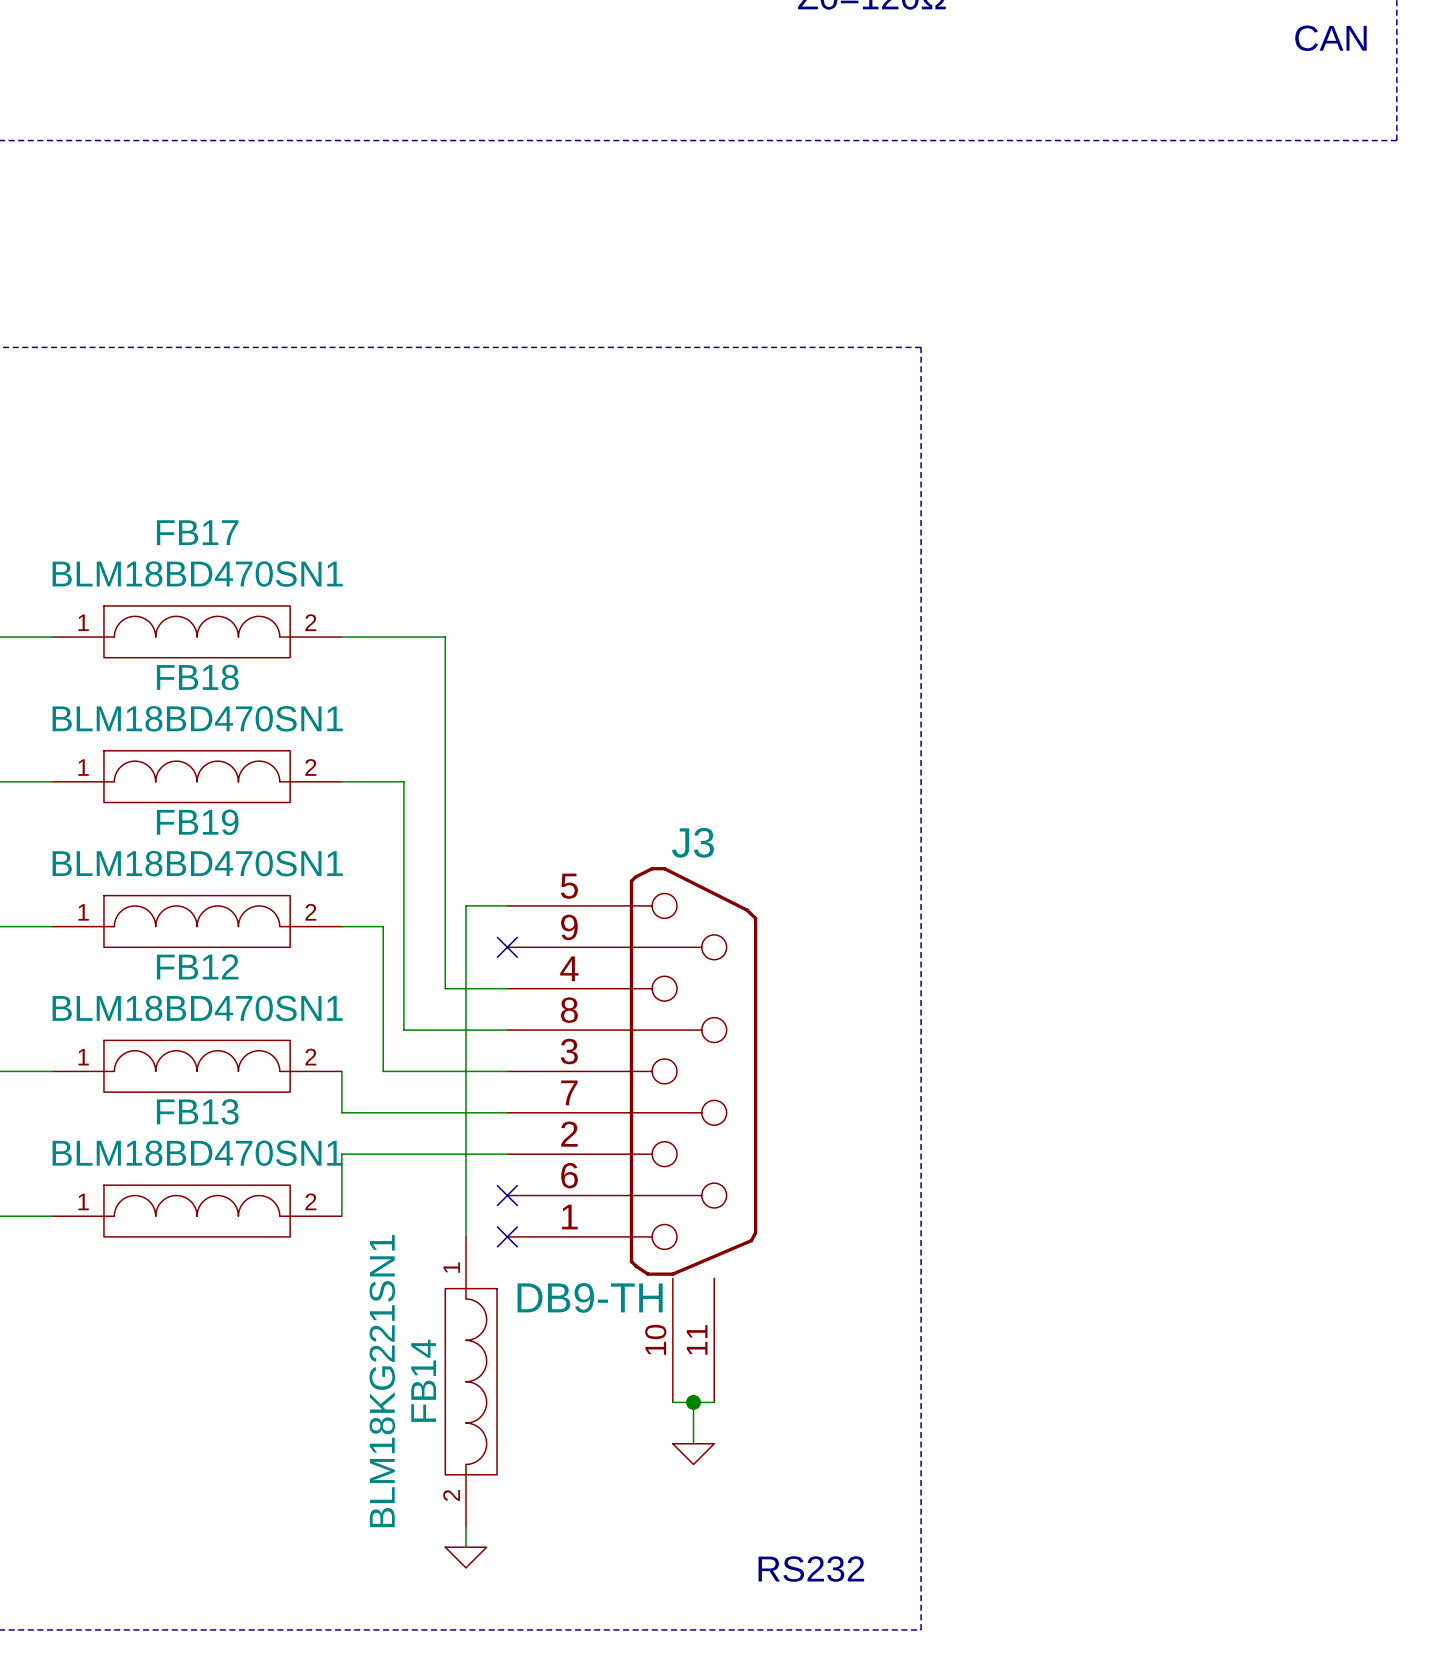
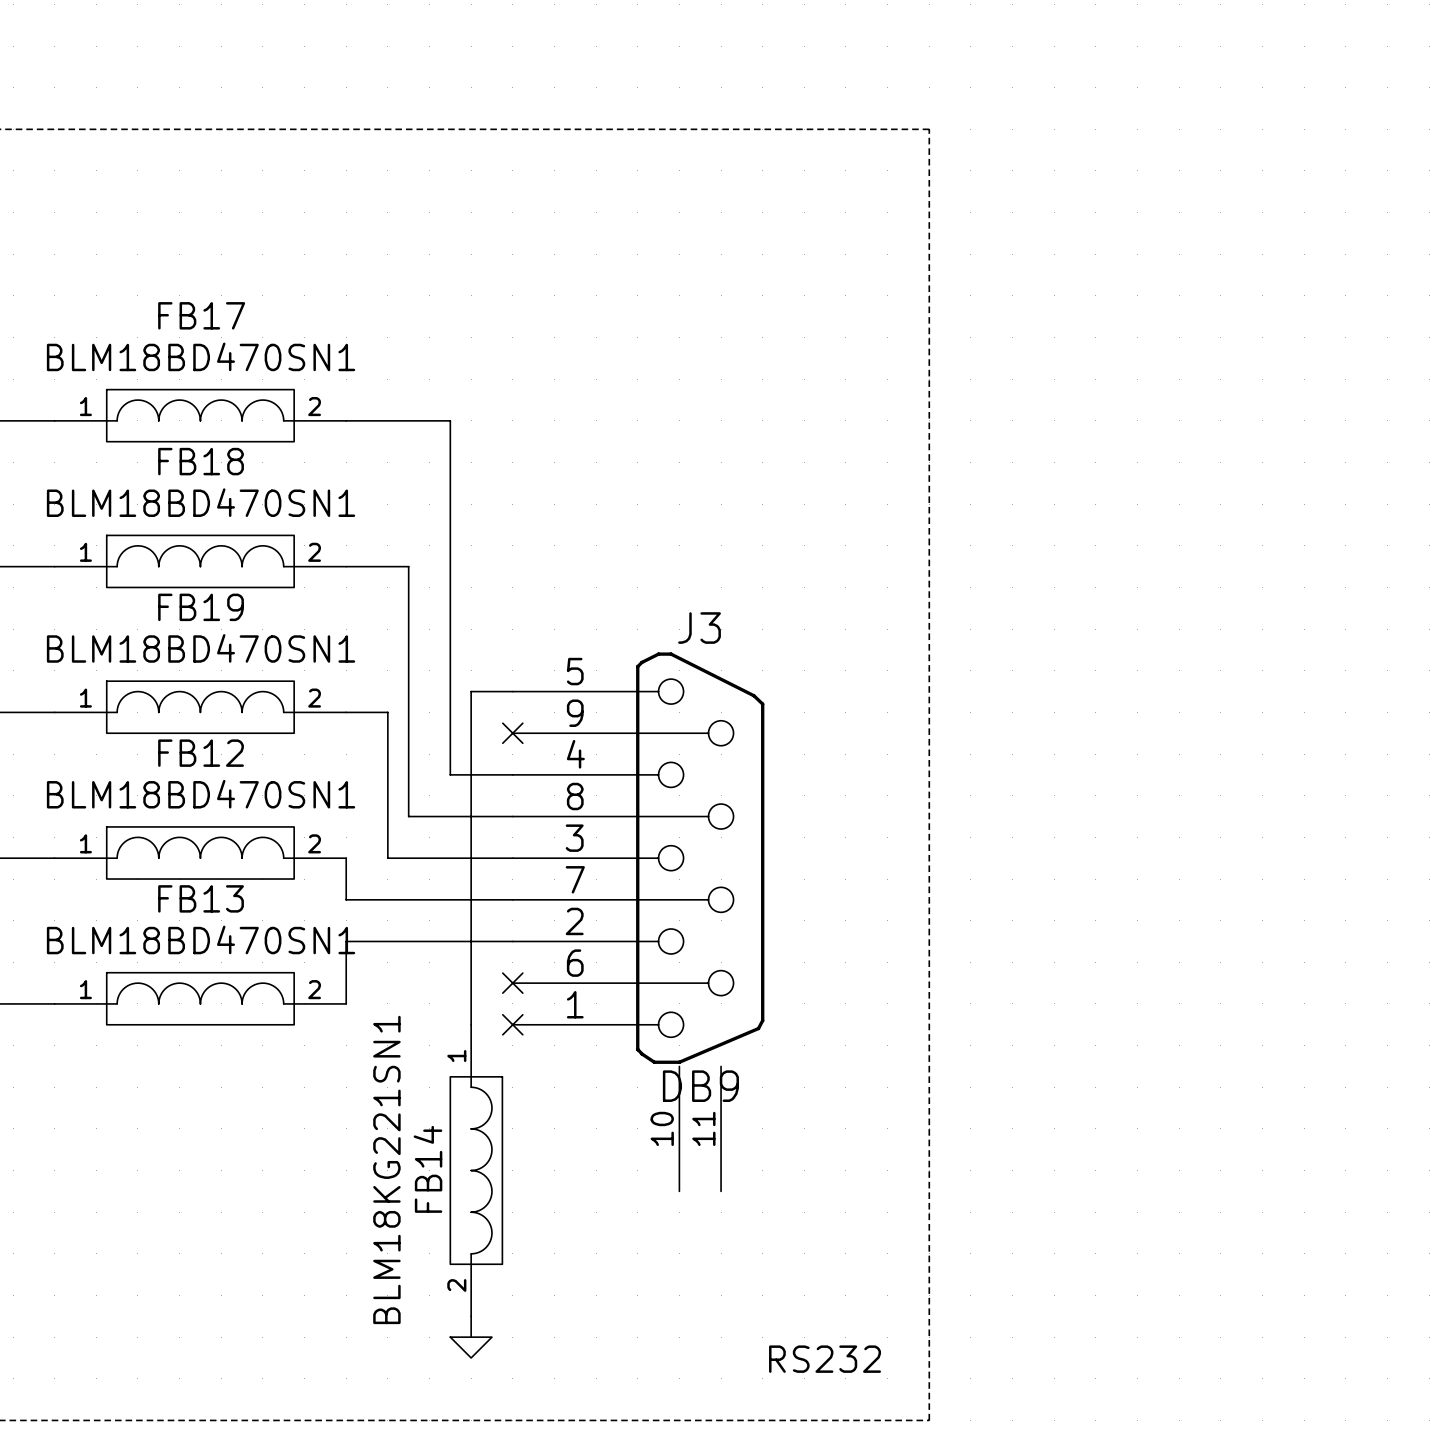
J3 value: DB9-TH (590, 1297) -> DB9 (700, 1086)
wire: (672, 1402) (714, 1402) -> none
wire: (693, 1402) (693, 1443) -> none
junction: (693, 1402) -> none
power symbol: (693, 1454) -> none

